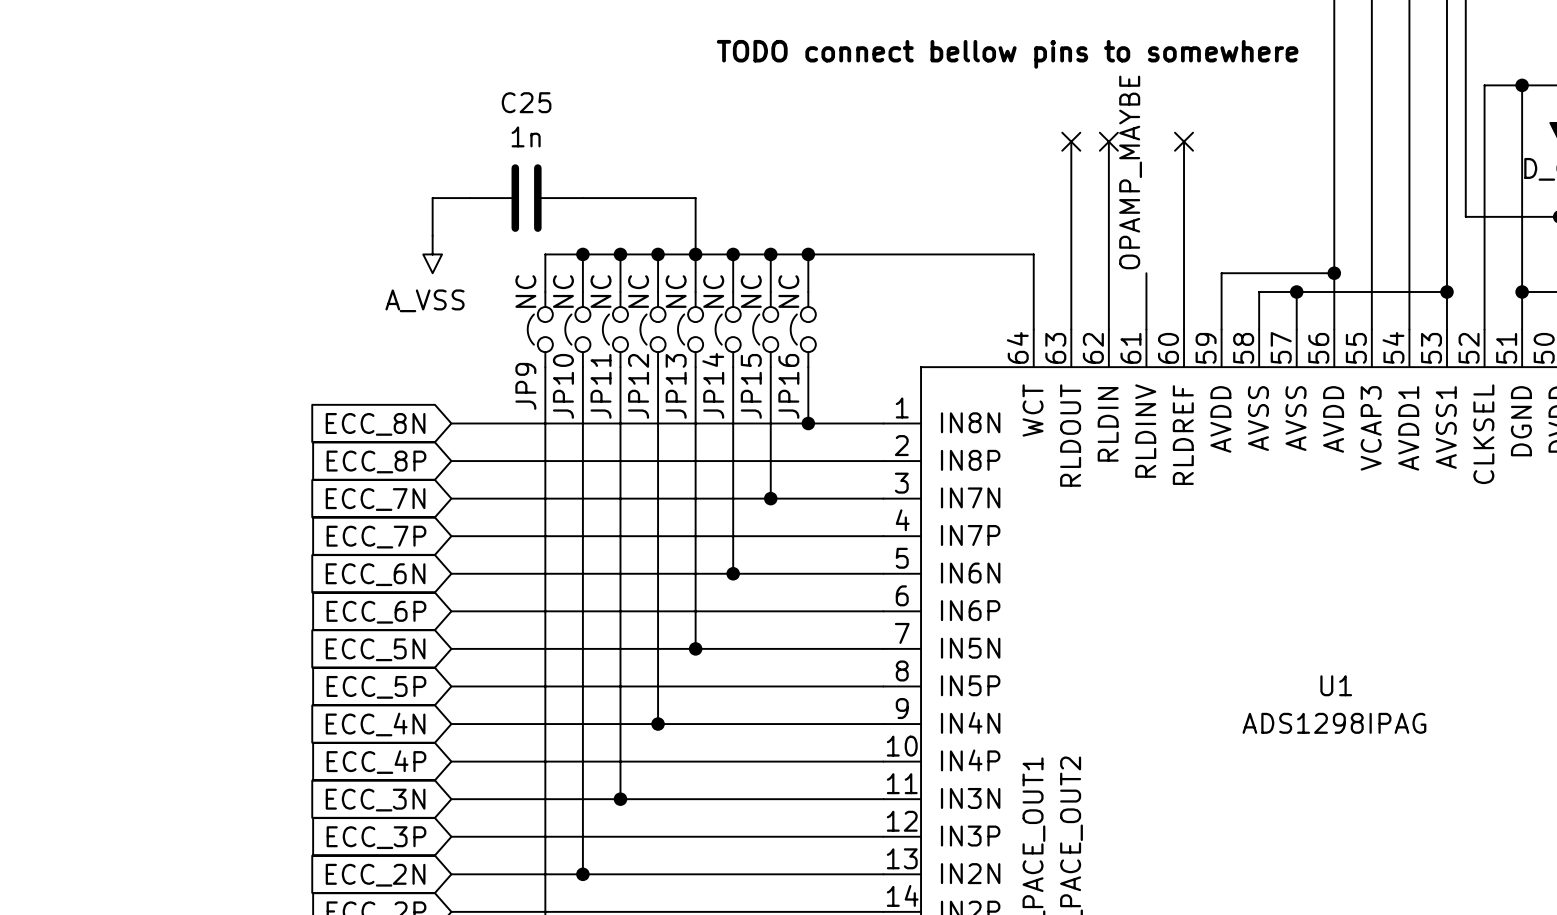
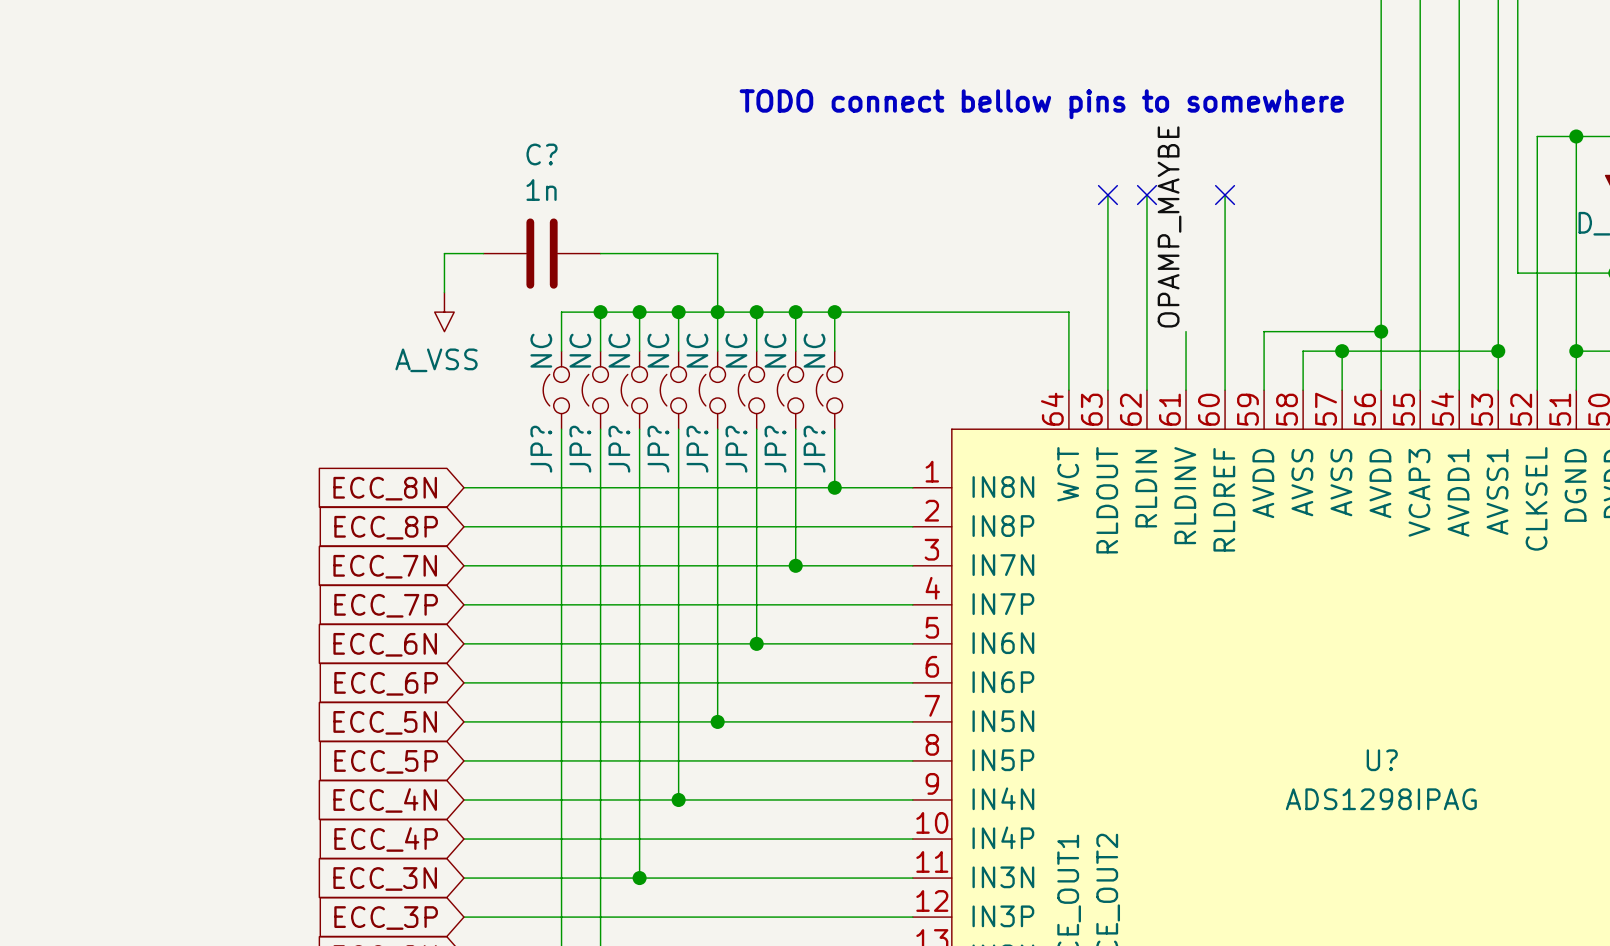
C25 name: C25 (526, 102) -> C? (542, 154)
JP14 name: JP14 (713, 385) -> JP? (736, 449)
JP9 name: JP9 (525, 386) -> JP? (541, 449)
JP10 name: JP10 (563, 386) -> JP? (580, 449)
JP11 name: JP11 (601, 386) -> JP? (619, 449)
JP12 name: JP12 (638, 386) -> JP? (658, 449)
JP13 name: JP13 (676, 386) -> JP? (697, 449)
JP15 name: JP15 (751, 386) -> JP? (775, 449)
JP16 name: JP16 (788, 386) -> JP? (814, 449)
U1 name: U1 (1336, 685) -> U? (1382, 760)

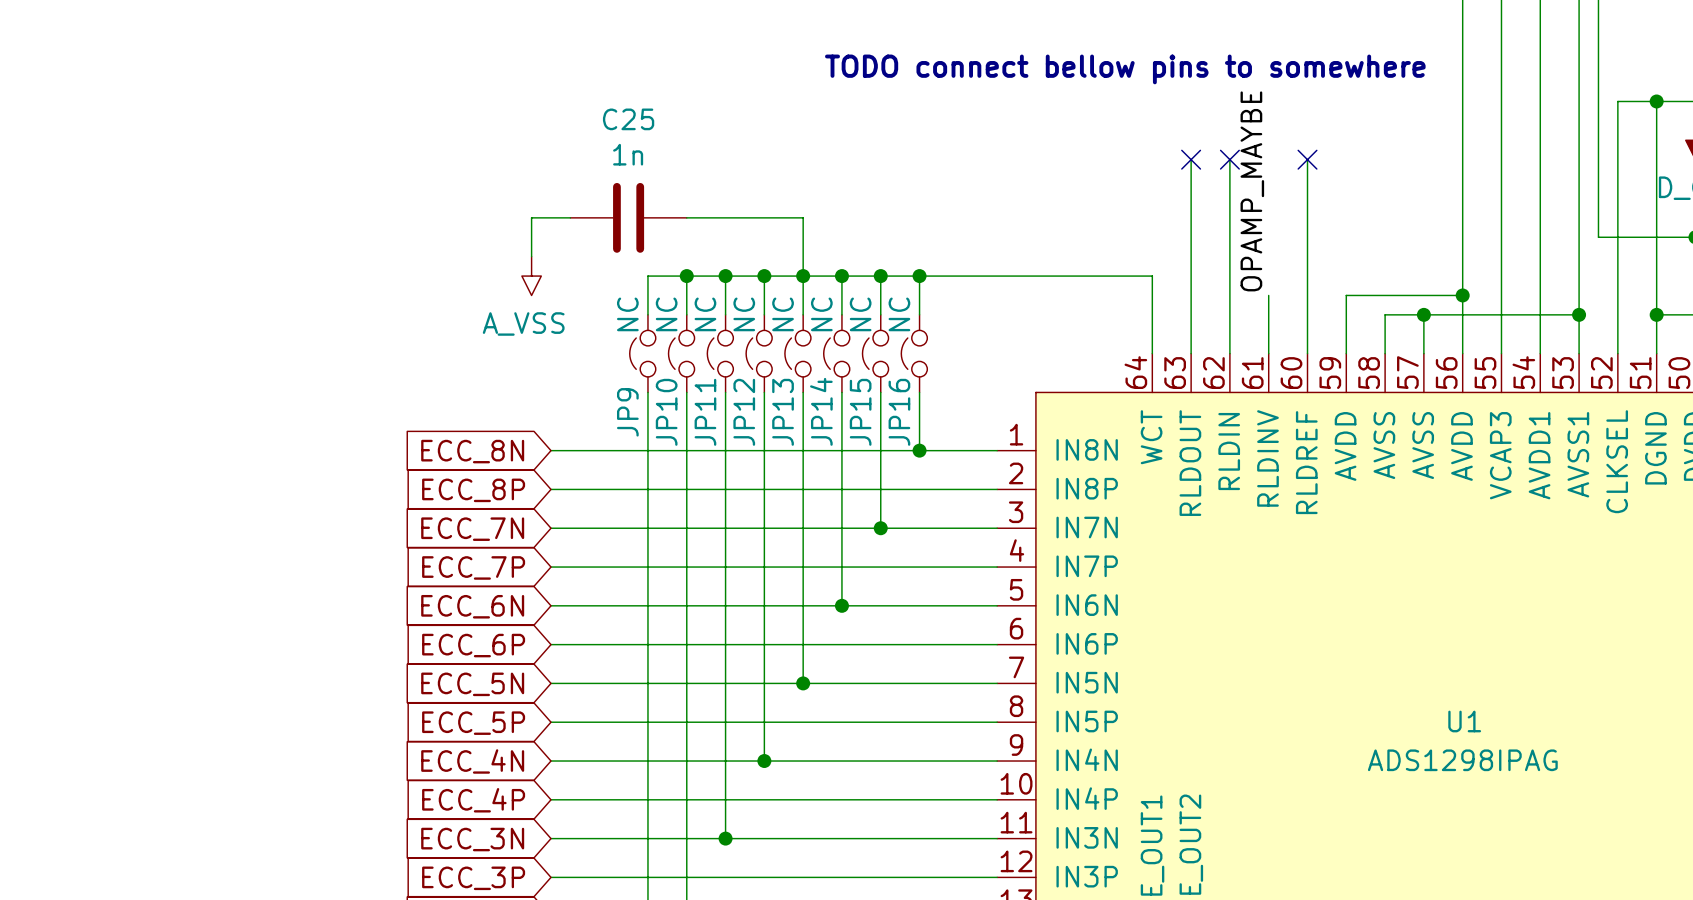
C? name: C? (542, 154) -> C25 (628, 119)
JP? name: JP? (541, 449) -> JP9 (627, 412)
JP? name: JP? (580, 449) -> JP10 (666, 412)
JP? name: JP? (619, 449) -> JP11 (705, 412)
JP? name: JP? (658, 449) -> JP12 (744, 412)
JP? name: JP? (697, 449) -> JP13 (783, 412)
JP? name: JP? (736, 449) -> JP14 (821, 411)
JP? name: JP? (775, 449) -> JP15 (860, 412)
JP? name: JP? (814, 449) -> JP16 (899, 412)
U? name: U? (1382, 760) -> U1 (1464, 721)

